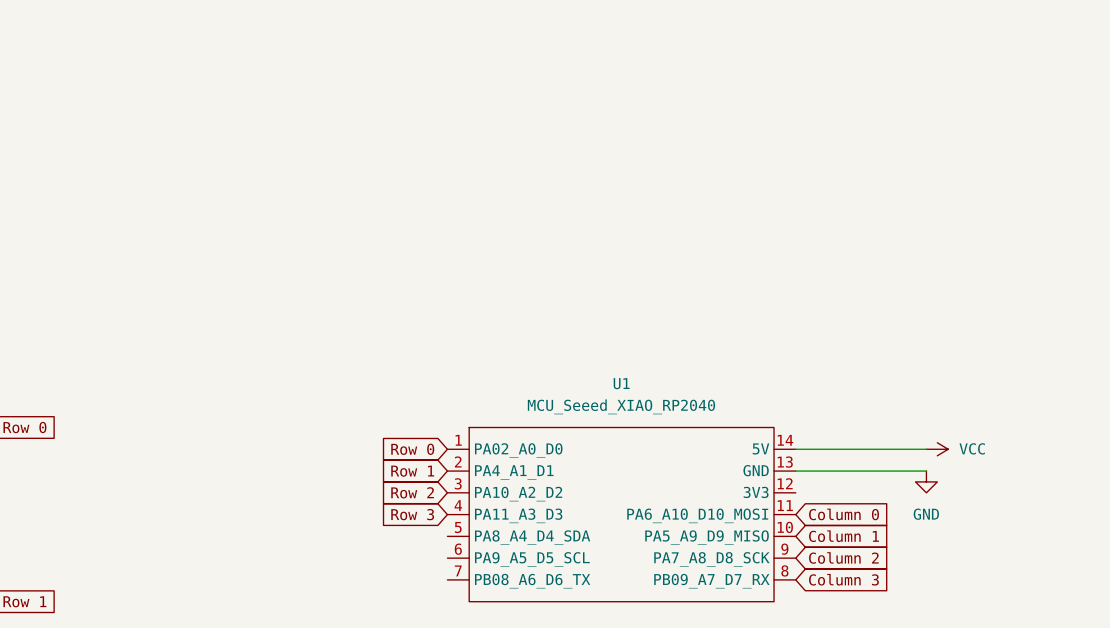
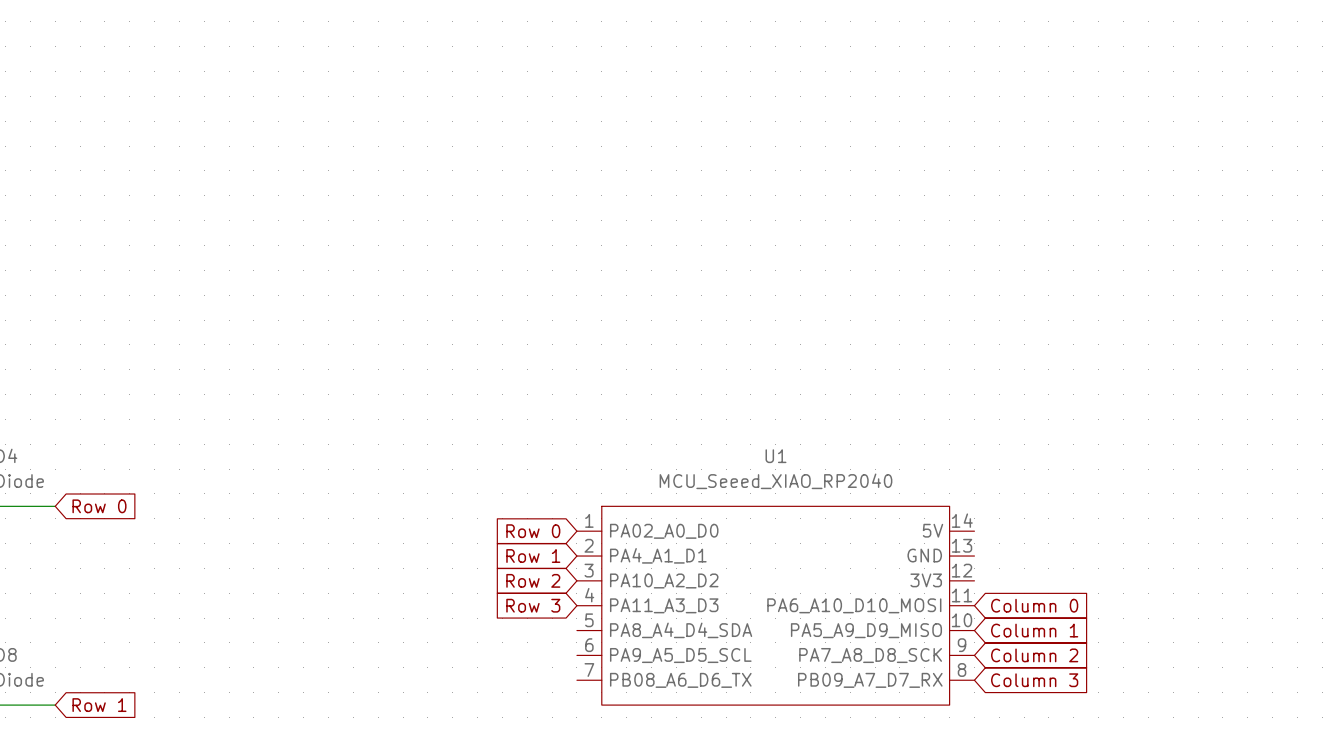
wire: (795, 449) (926, 449) -> none
power symbol: VCC (937, 449) -> none
wire: (795, 471) (926, 471) -> none
power symbol: GND (926, 481) -> none

